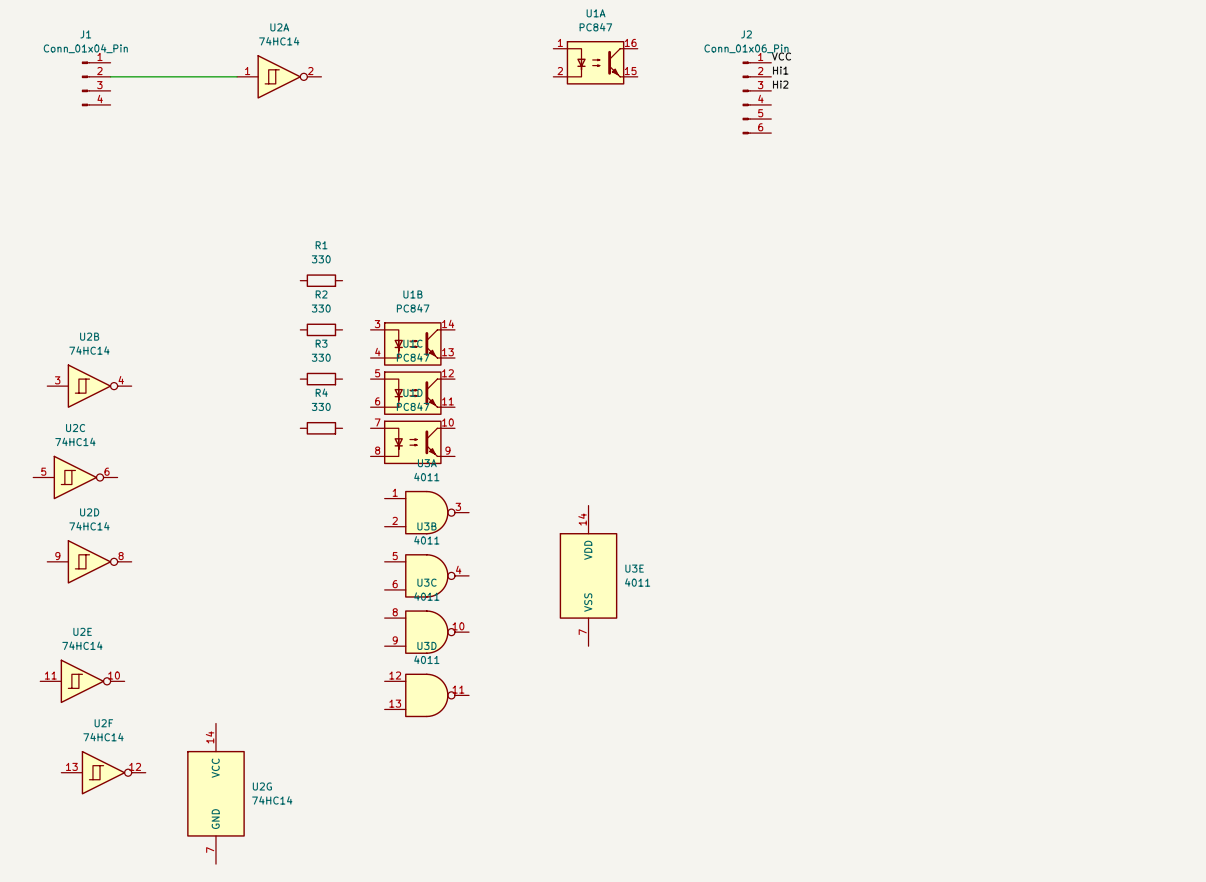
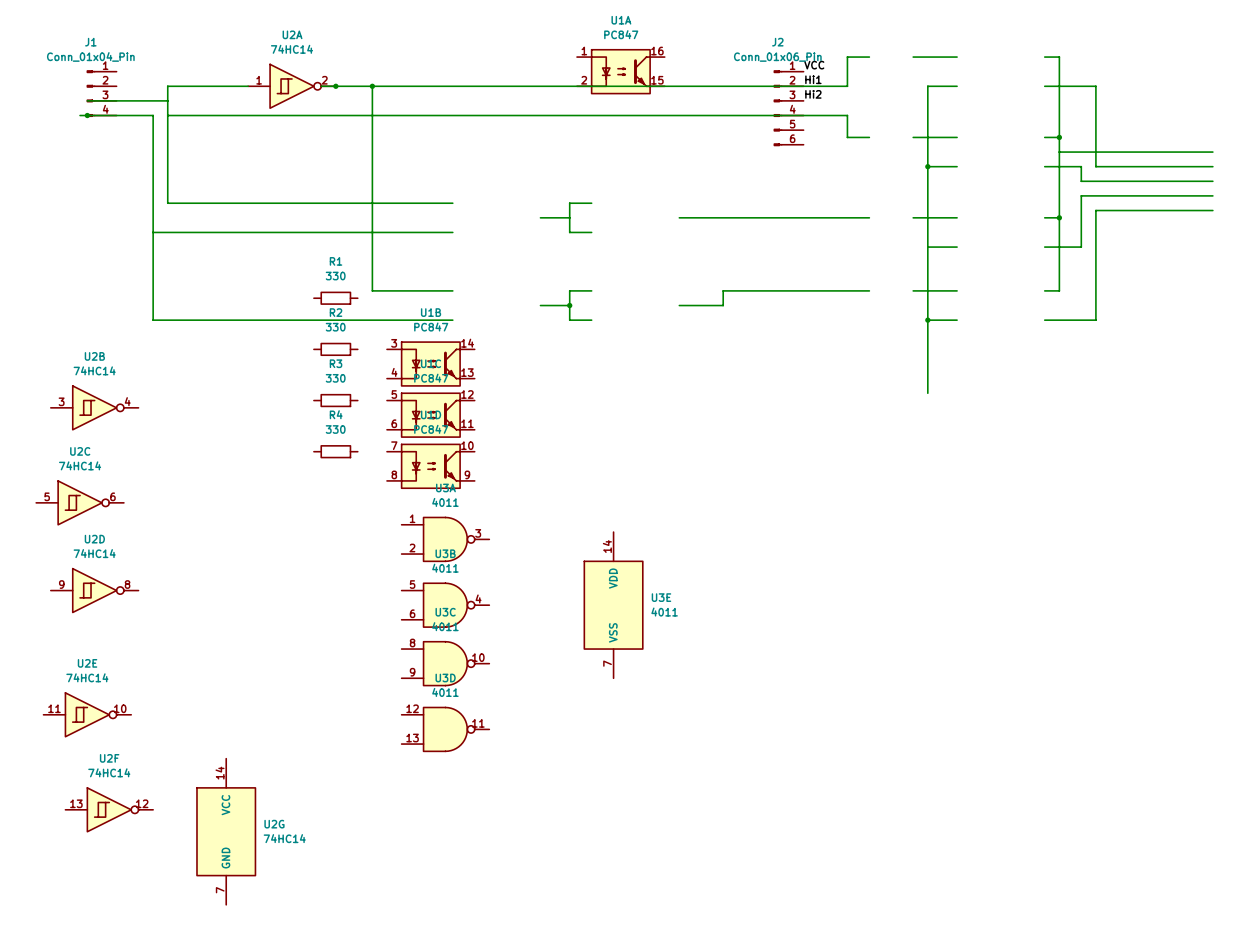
wire: none -> (869, 57) (847, 57) (847, 86) (321, 86)
wire: none -> (913, 57) (957, 57)
wire: none -> (1044, 57) (1059, 57) (1059, 290) (1044, 290)
wire: (110, 76) (159, 76) -> (452, 203) (167, 203) (167, 86)
junction: none -> (335, 86)
wire: none -> (372, 86) (372, 290) (452, 290)
junction: none -> (372, 86)
wire: none -> (957, 86) (927, 86) (927, 393)
wire: none -> (1044, 86) (1095, 86) (1095, 166) (1212, 166)
wire: none -> (87, 100) (167, 100)
wire: none -> (80, 115) (153, 115) (153, 320) (452, 320)
junction: none -> (87, 115)
wire: none -> (167, 115) (847, 115) (847, 137) (869, 137)
wire: none -> (913, 137) (957, 137)
wire: none -> (1044, 137) (1059, 137)
junction: none -> (1059, 137)
wire: none -> (1059, 152) (1212, 152)
wire: none -> (927, 166) (957, 166)
junction: none -> (927, 166)
wire: none -> (1044, 166) (1081, 166) (1081, 181) (1212, 181)
wire: none -> (1212, 195) (1081, 195) (1081, 247) (1044, 247)
wire: none -> (591, 203) (569, 203) (569, 232) (591, 232)
wire: none -> (1212, 210) (1095, 210) (1095, 320) (1044, 320)
wire: none -> (540, 217) (569, 217)
wire: none -> (679, 217) (869, 217)
wire: none -> (913, 217) (957, 217)
wire: none -> (1044, 217) (1059, 217)
junction: none -> (1059, 217)
wire: none -> (153, 232) (452, 232)
wire: none -> (927, 247) (957, 247)
wire: none -> (591, 290) (569, 290) (569, 320) (591, 320)
wire: none -> (869, 290) (723, 290) (723, 305) (679, 305)
wire: none -> (913, 290) (957, 290)
wire: none -> (540, 305) (569, 305)
junction: none -> (569, 305)
wire: none -> (927, 320) (957, 320)
junction: none -> (927, 320)

